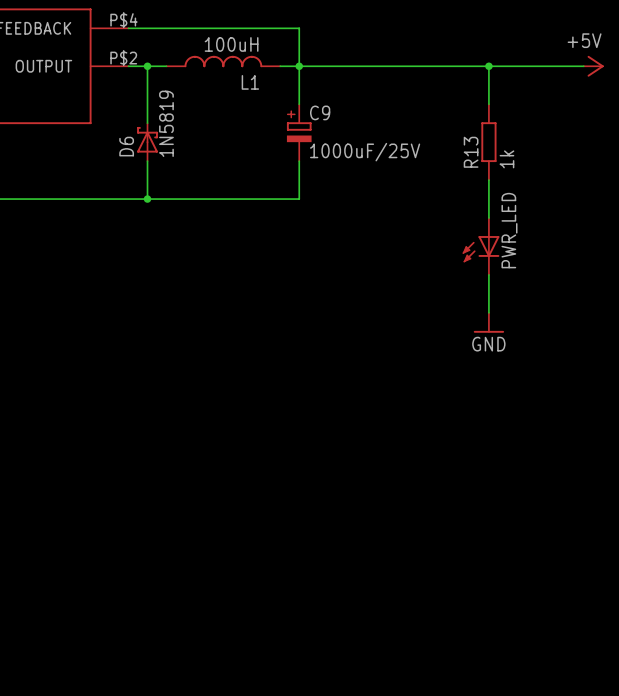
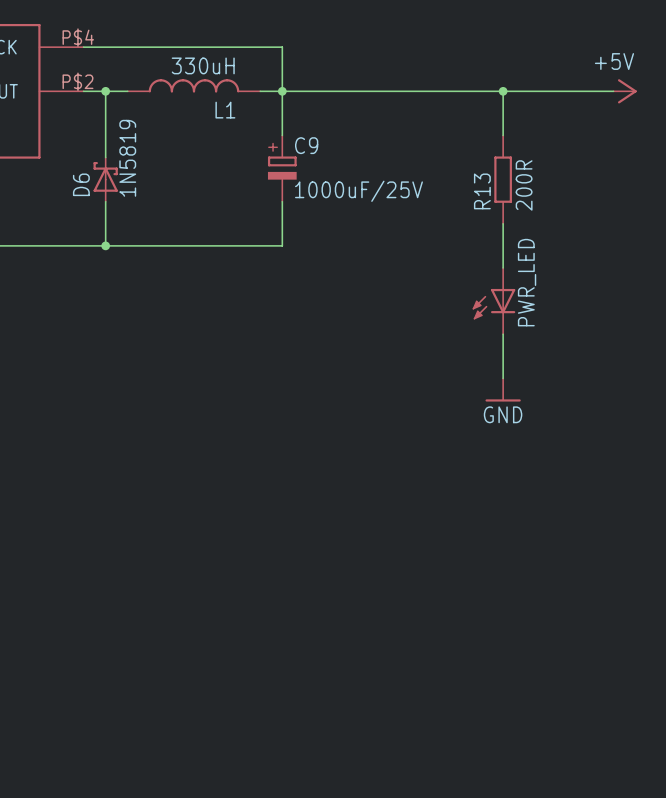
L1 value: 100uH (231, 44) -> 330uH (203, 65)
R13 value: 1k (506, 159) -> 200R (524, 185)

